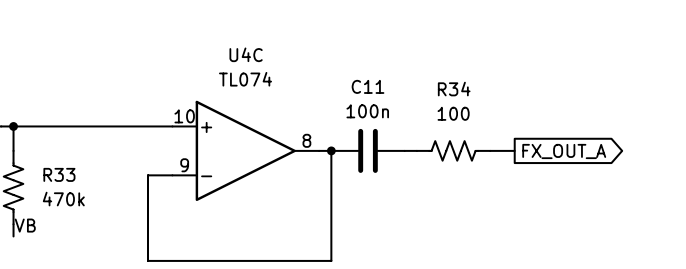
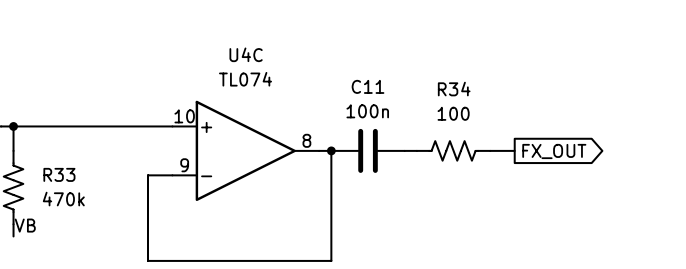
global label: FX_OUT_A (564, 151) -> FX_OUT (554, 151)

